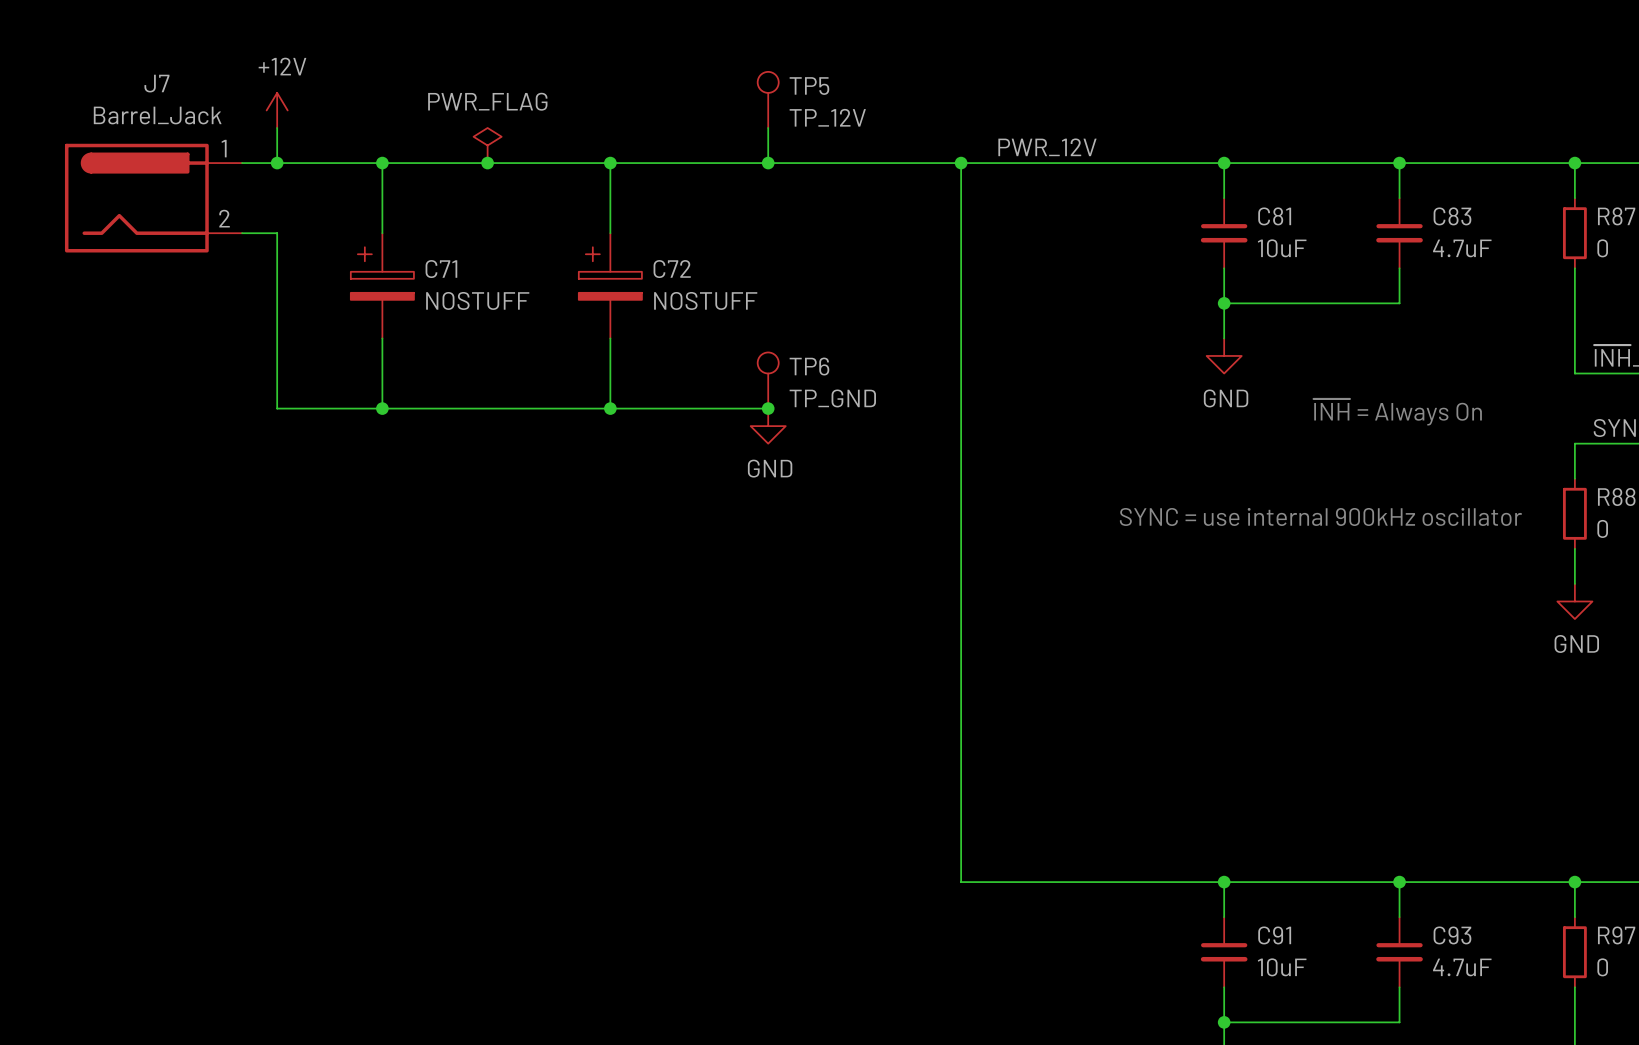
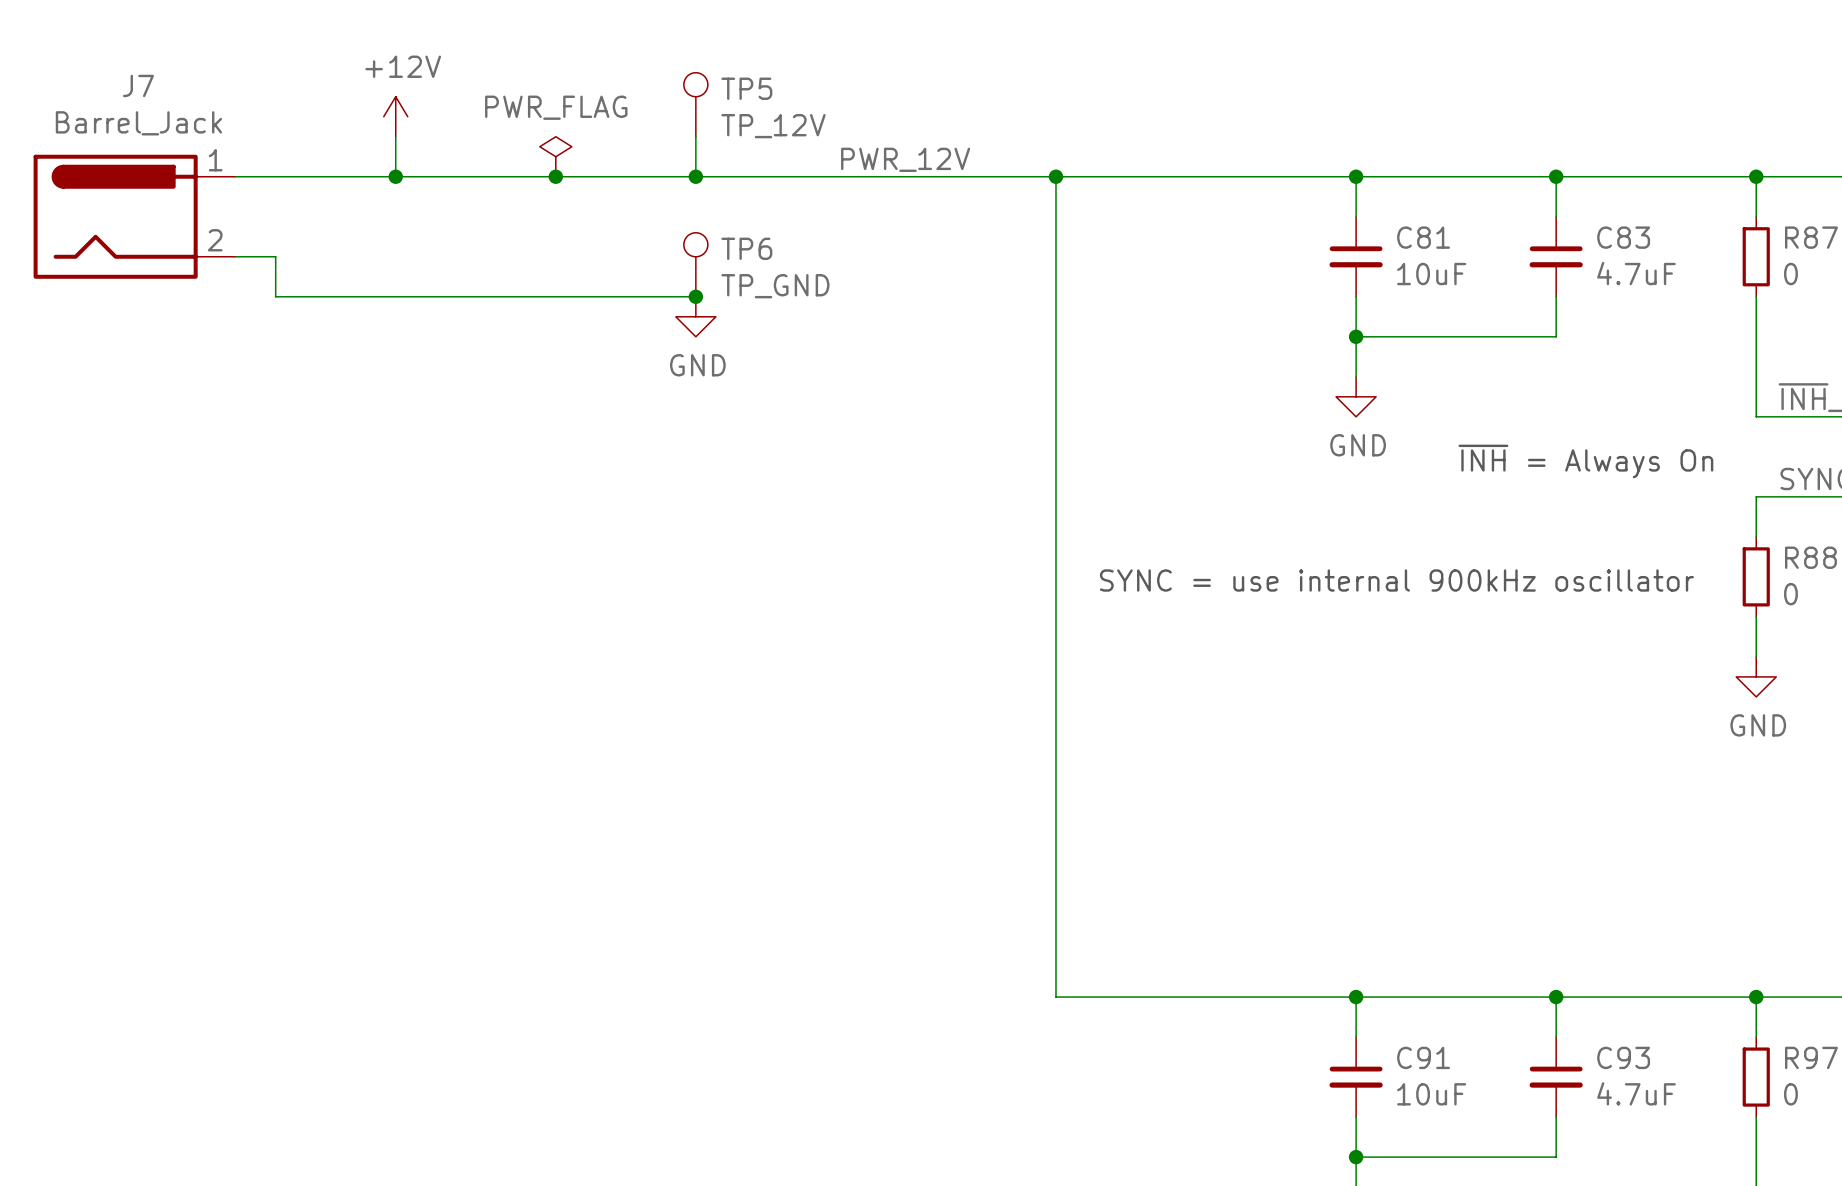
TP5 position: (768, 99) -> (695, 104)
power symbol position: +12V (277, 110) -> +12V (395, 116)
wire: (277, 127) (277, 163) -> none
wire: (768, 127) (768, 163) -> (695, 136) (695, 176)
power symbol position: PWR_FLAG (487, 145) -> PWR_FLAG (555, 156)
label position: PWR_12V (1047, 147) -> PWR_12V (905, 159)
junction: (277, 163) -> none
wire: (382, 163) (382, 233) -> (395, 176) (395, 136)
junction position: (487, 163) -> (555, 176)
wire: (610, 163) (610, 233) -> none
junction position: (610, 163) -> (695, 176)
junction: (768, 163) -> none
wire: (277, 268) (277, 408) (768, 408) -> (275, 296) (695, 296)
junction: none -> (695, 296)
C71: NOSTUFF (382, 285) -> none
C72: NOSTUFF (610, 285) -> none
wire: (382, 338) (382, 408) -> none
wire: (610, 338) (610, 408) -> none
TP6 position: (768, 380) -> (695, 264)
junction: (382, 408) -> none
junction: (610, 408) -> none
junction: (768, 408) -> none
power symbol position: GND (768, 426) -> GND (695, 316)

